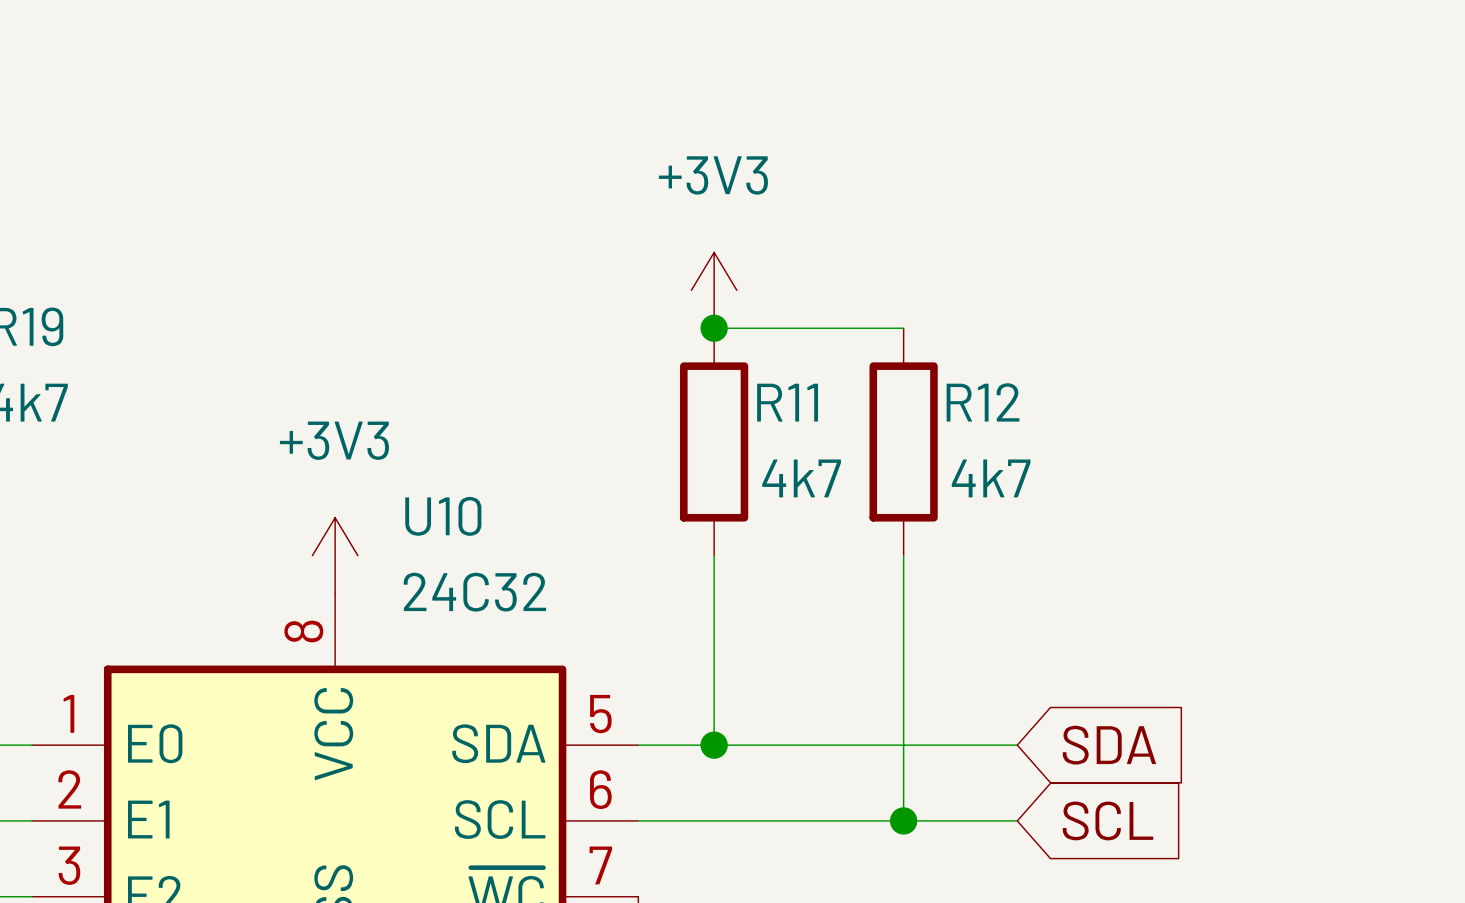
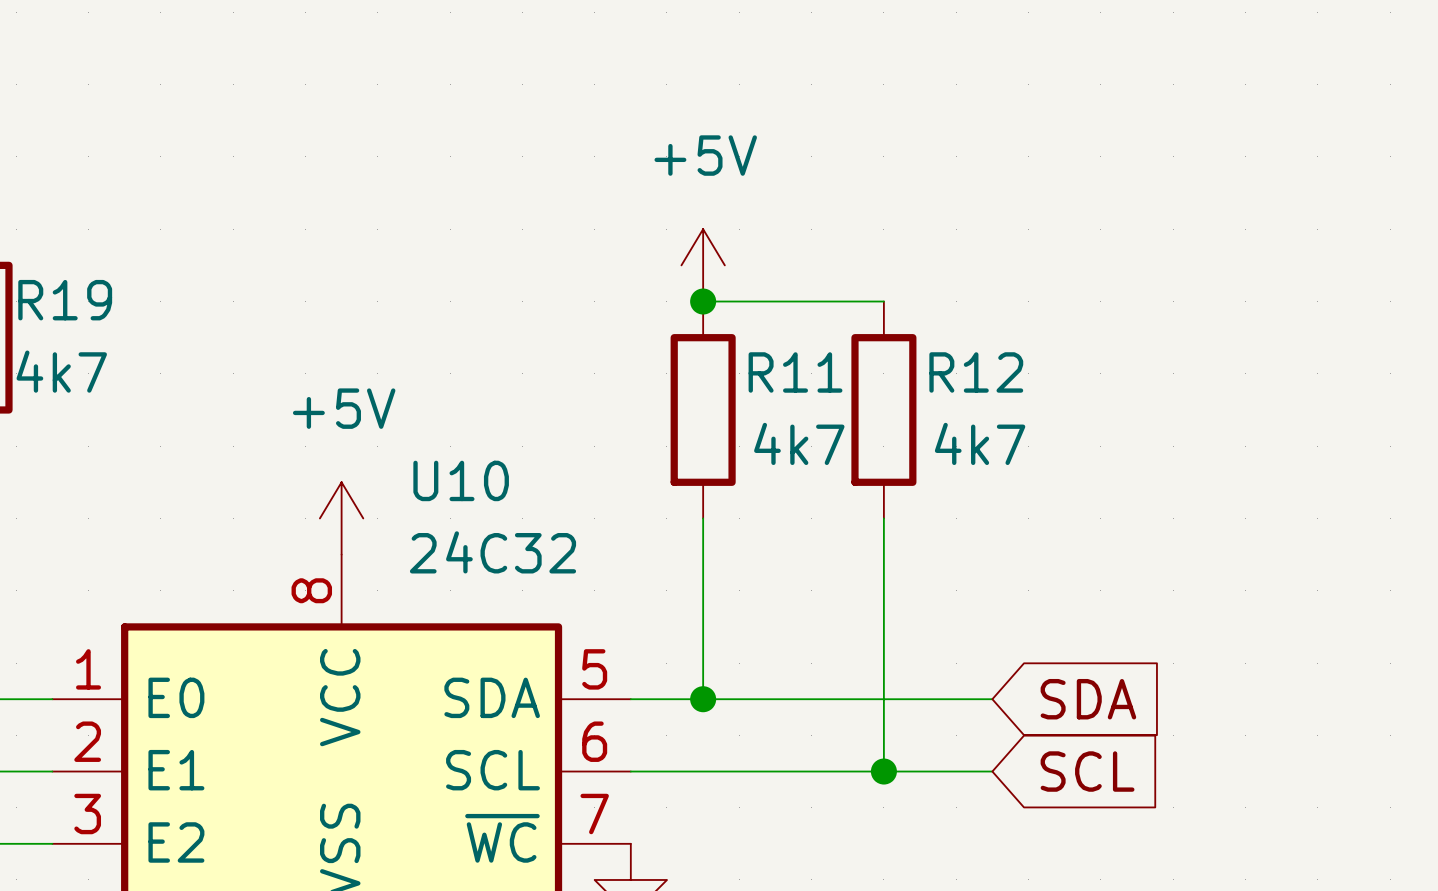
power symbol: +3V3 (714, 290) -> +5V (703, 265)
power symbol: +3V3 (335, 555) -> +5V (341, 518)

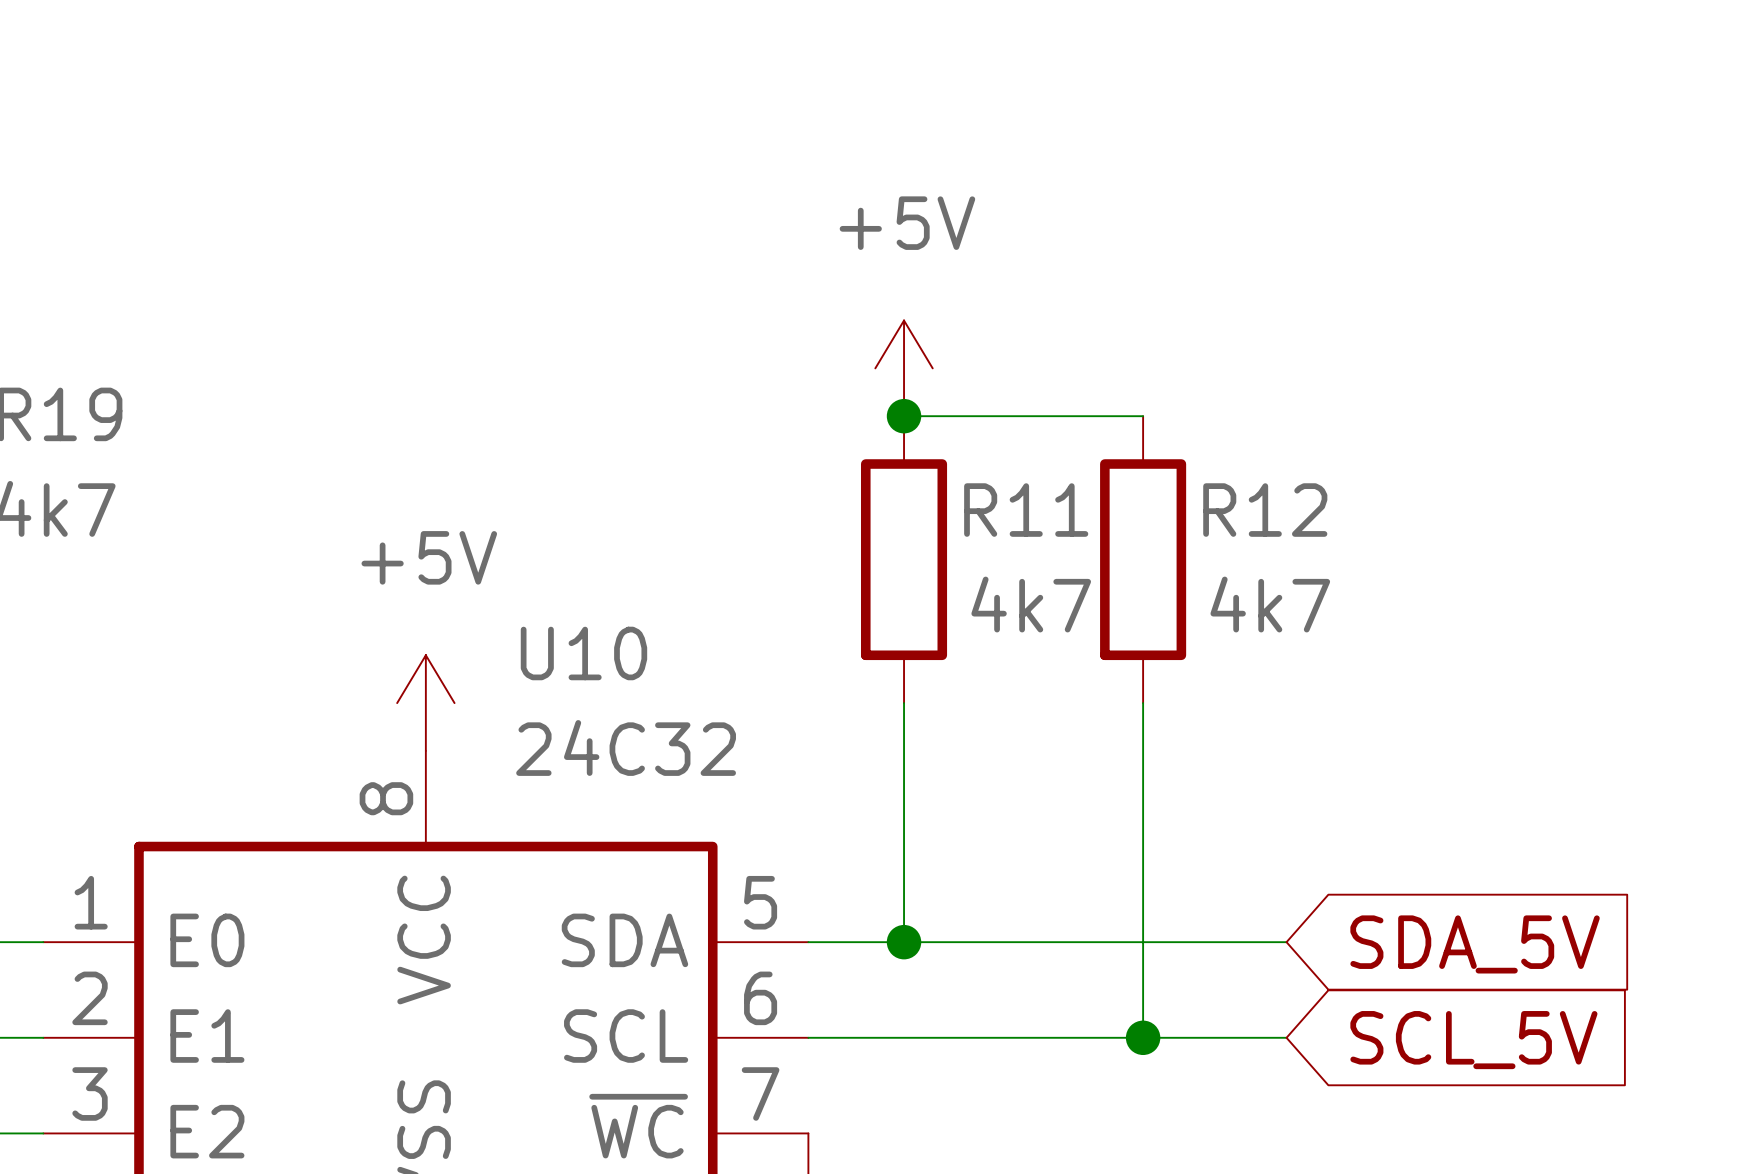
global label: SDA (1088, 699) -> SDA_5V (1475, 944)
global label: SCL (1087, 771) -> SCL_5V (1473, 1040)

